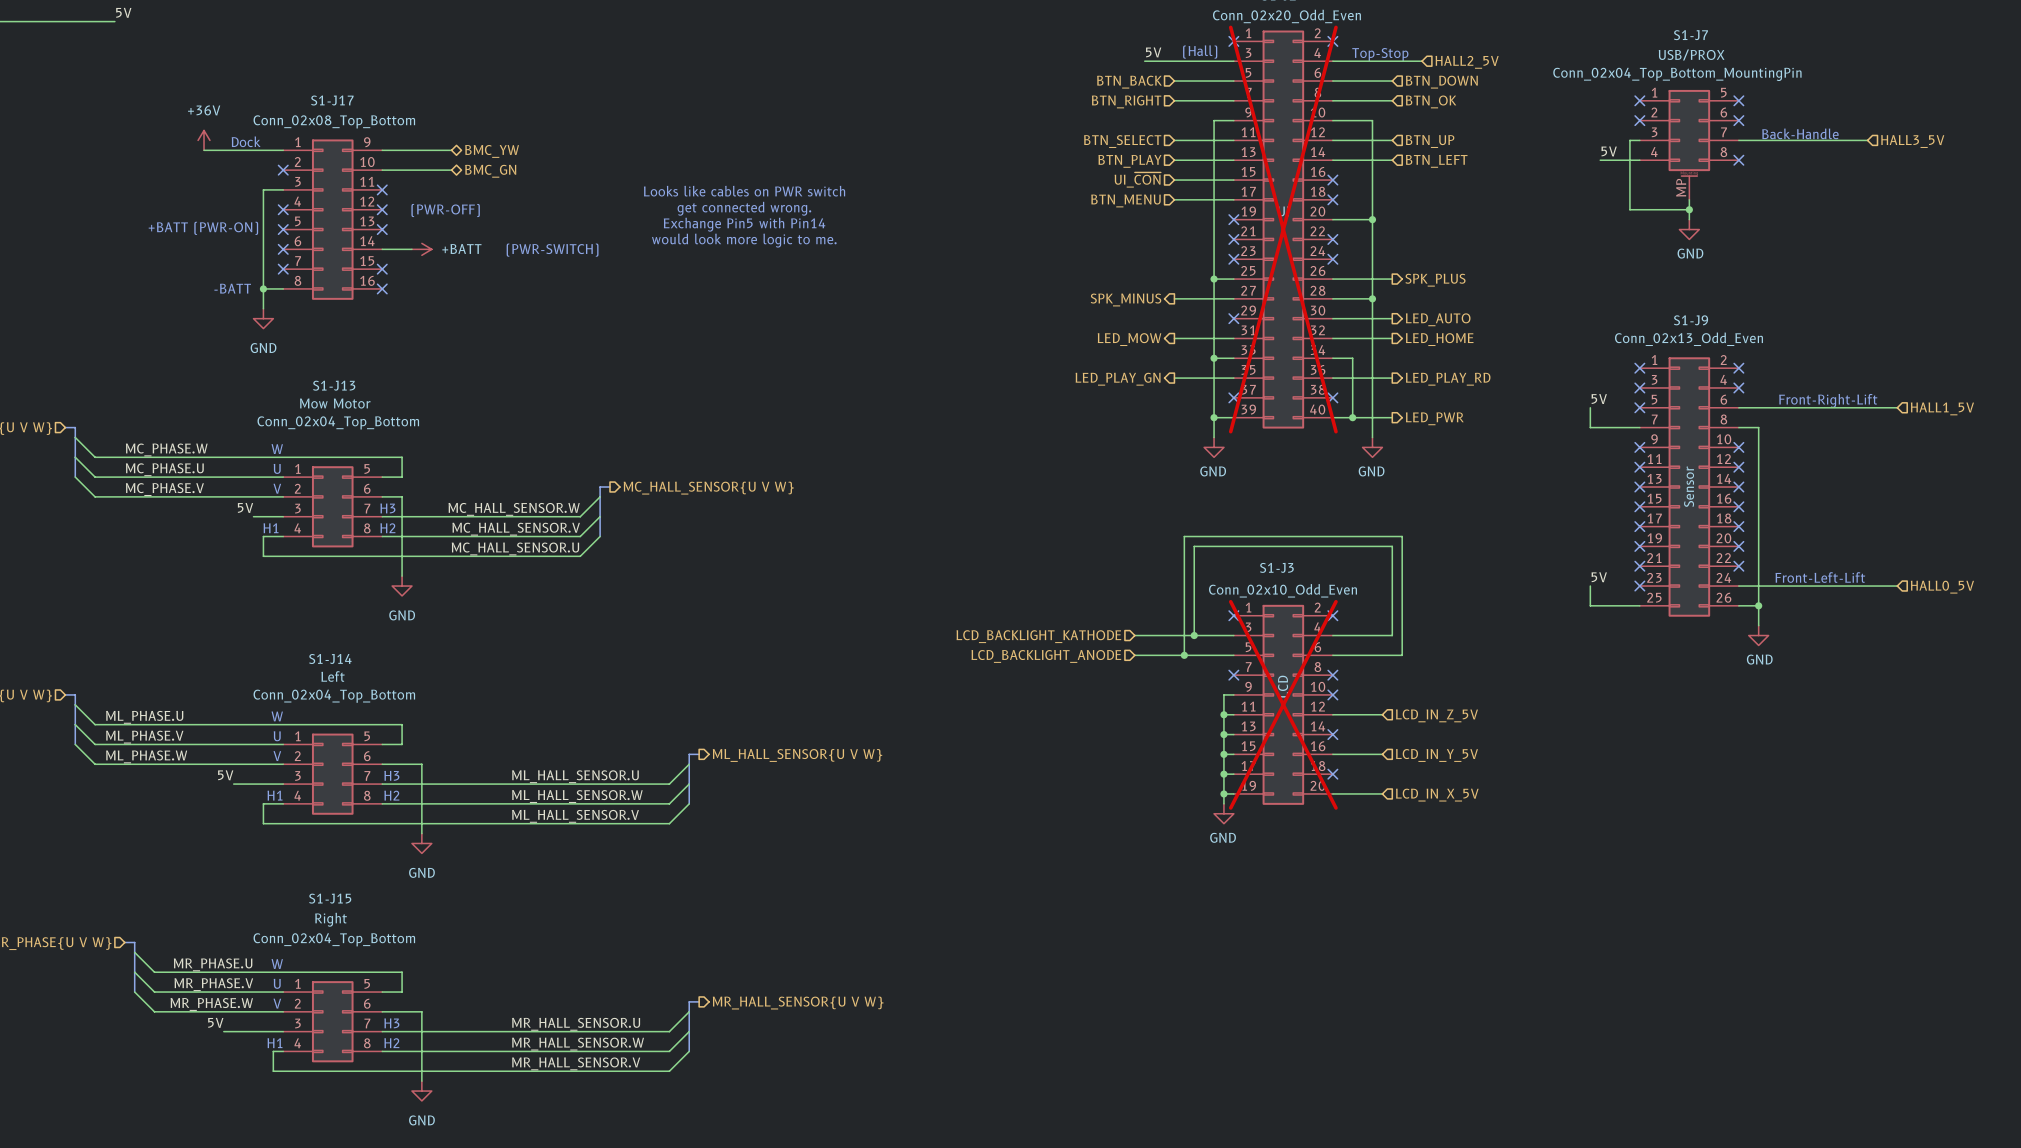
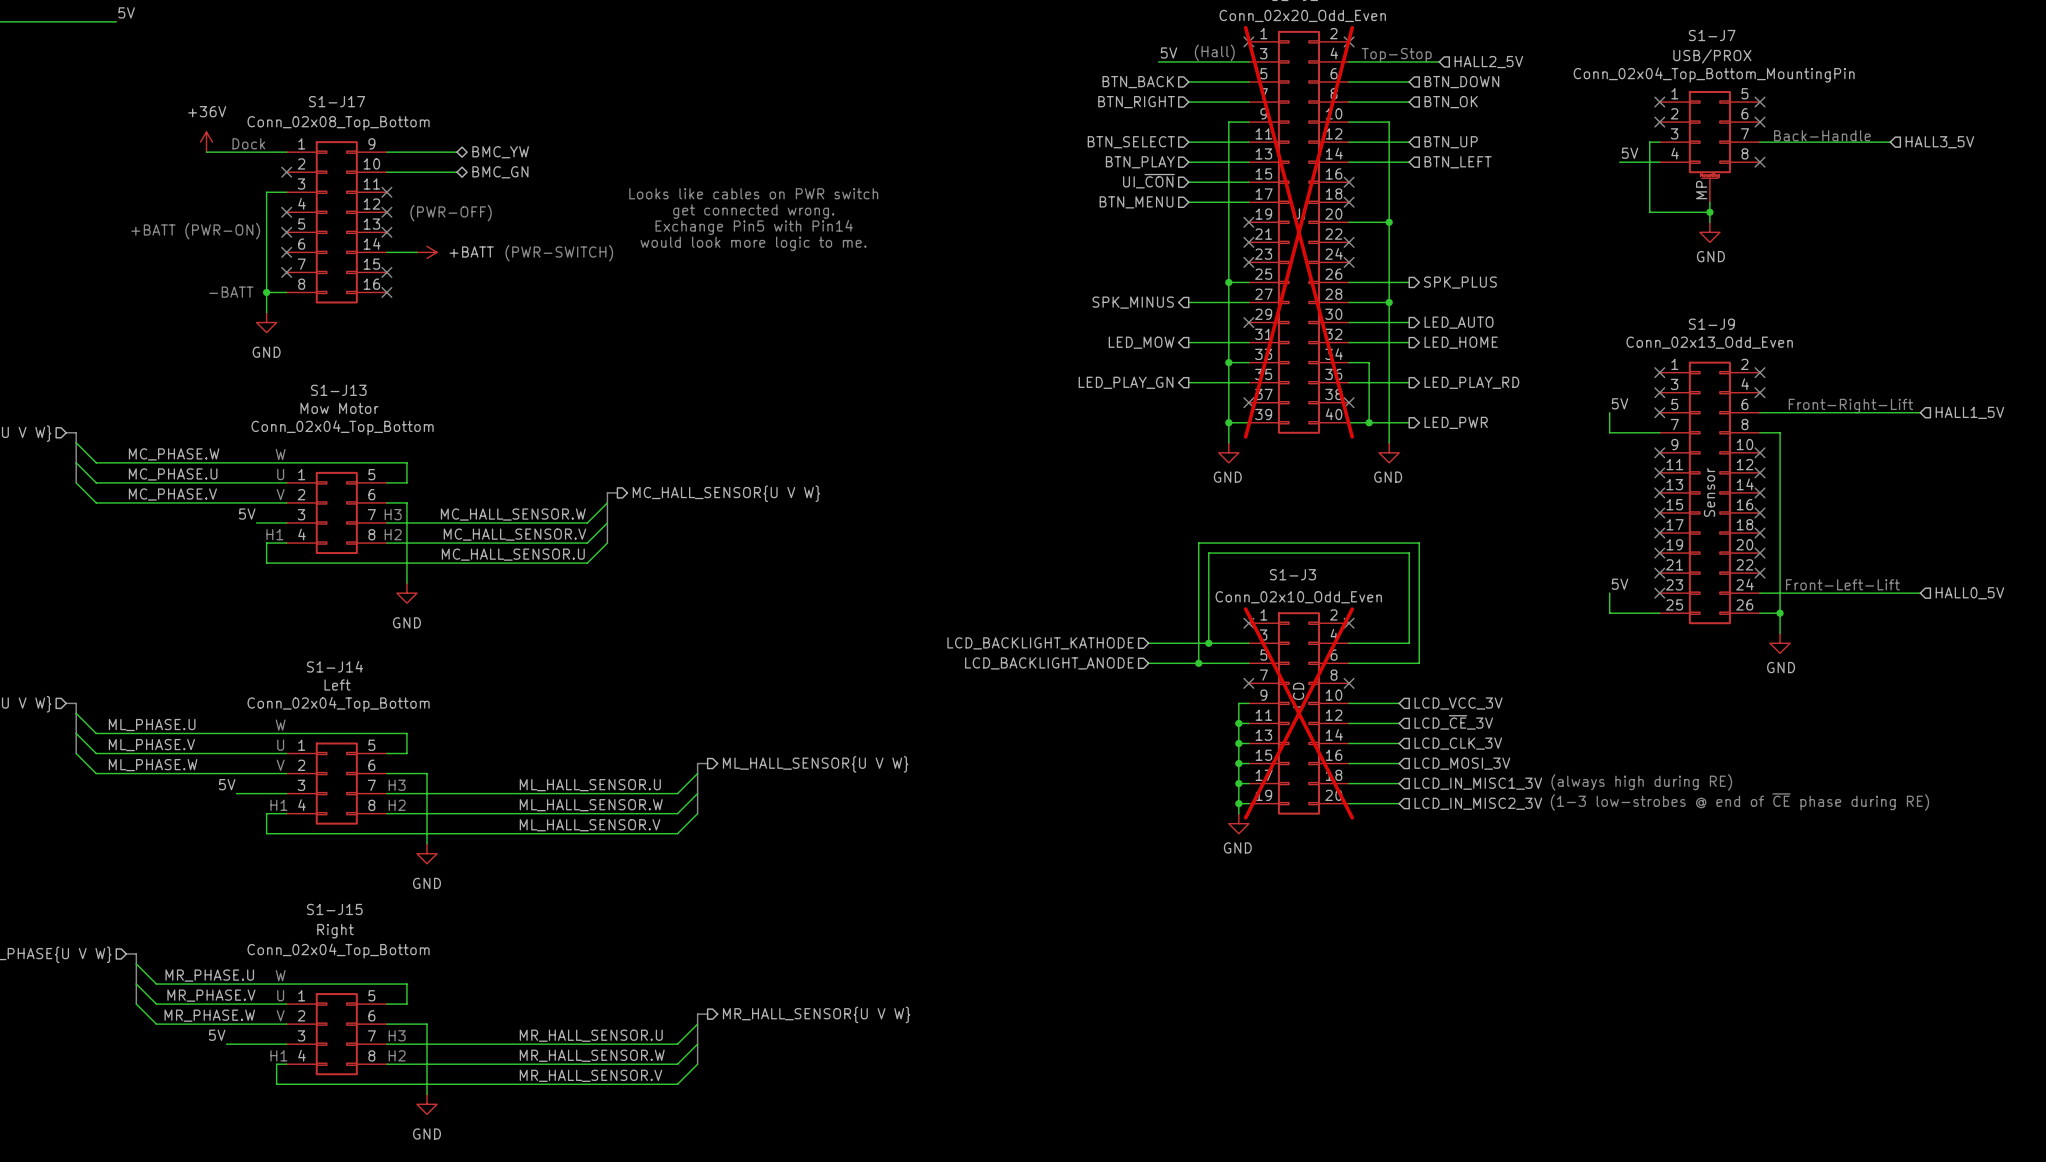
wire: none -> (1349, 703) (1399, 703)
no-connect mark: (1332, 694) -> none
hierarchical label: none -> LCD_VCC_3V (1458, 703)
hierarchical label: LCD_IN_Z_5V (1436, 715) -> LCD_~{CE}_3V (1453, 722)
wire: none -> (1349, 743) (1399, 743)
no-connect mark: (1332, 734) -> none
hierarchical label: none -> LCD_CLK_3V (1458, 743)
hierarchical label: LCD_IN_Y_5V (1436, 755) -> LCD_MOSI_3V (1462, 763)
text: none -> (always high during RE) (1641, 782)
wire: none -> (1349, 783) (1399, 783)
no-connect mark: (1332, 774) -> none
hierarchical label: none -> LCD_IN_MISC1_3V (1478, 783)
text: none -> (1-3 low-strobes @ end of ~{CE} phase during RE) (1739, 802)
hierarchical label: LCD_IN_X_5V (1437, 795) -> LCD_IN_MISC2_3V (1478, 803)

